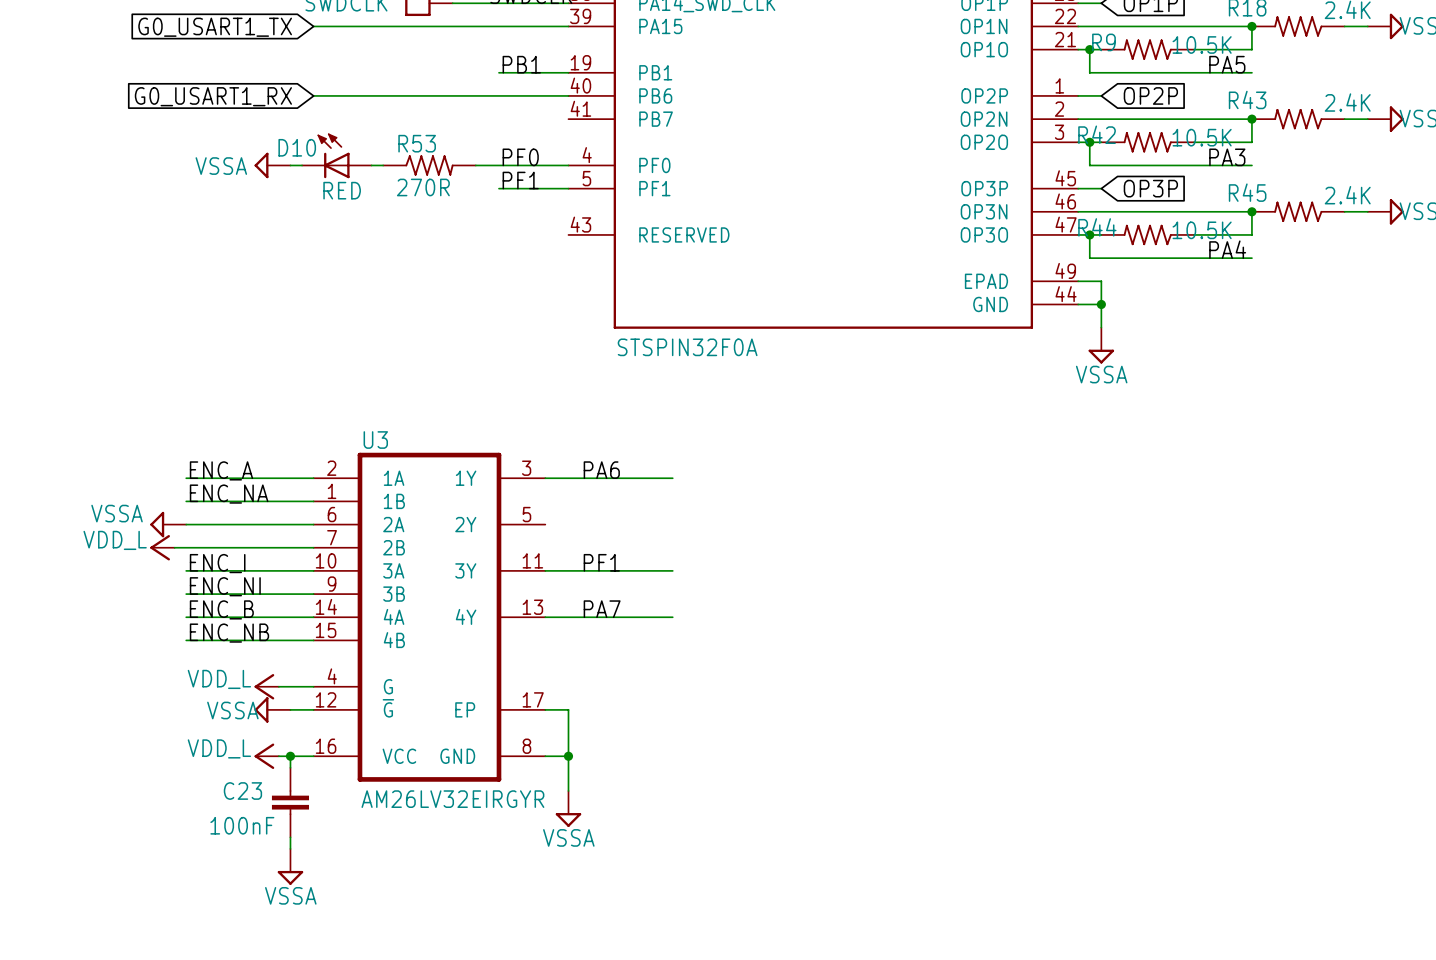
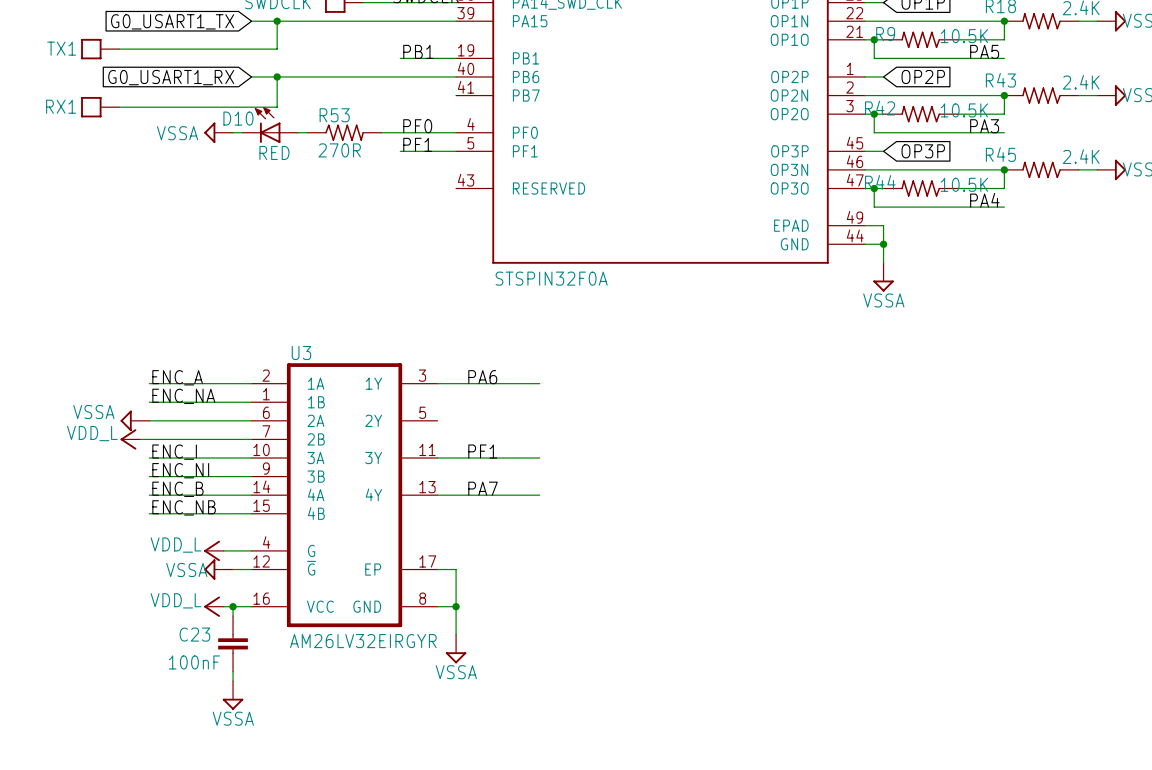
wire: none -> (277, 21) (277, 49) (119, 49)
junction: none -> (277, 21)
TX1: none -> (100, 49)
wire: none -> (277, 76) (277, 107) (119, 107)
junction: none -> (277, 76)
RX1: none -> (100, 107)

